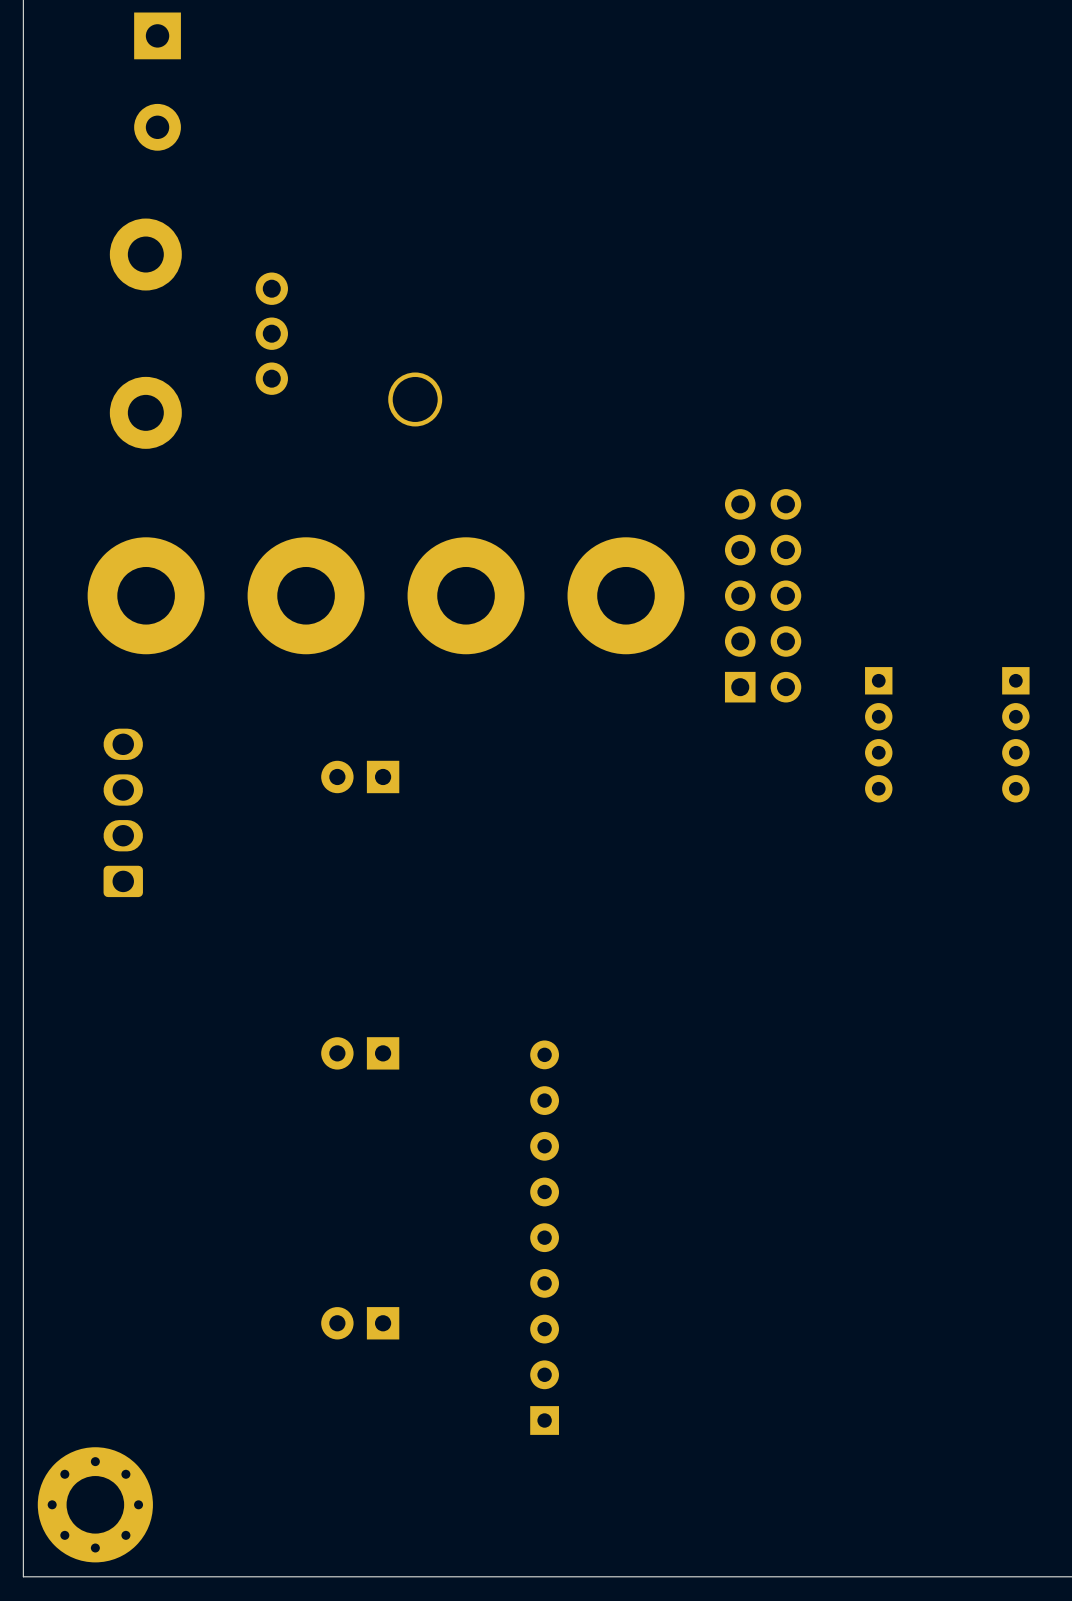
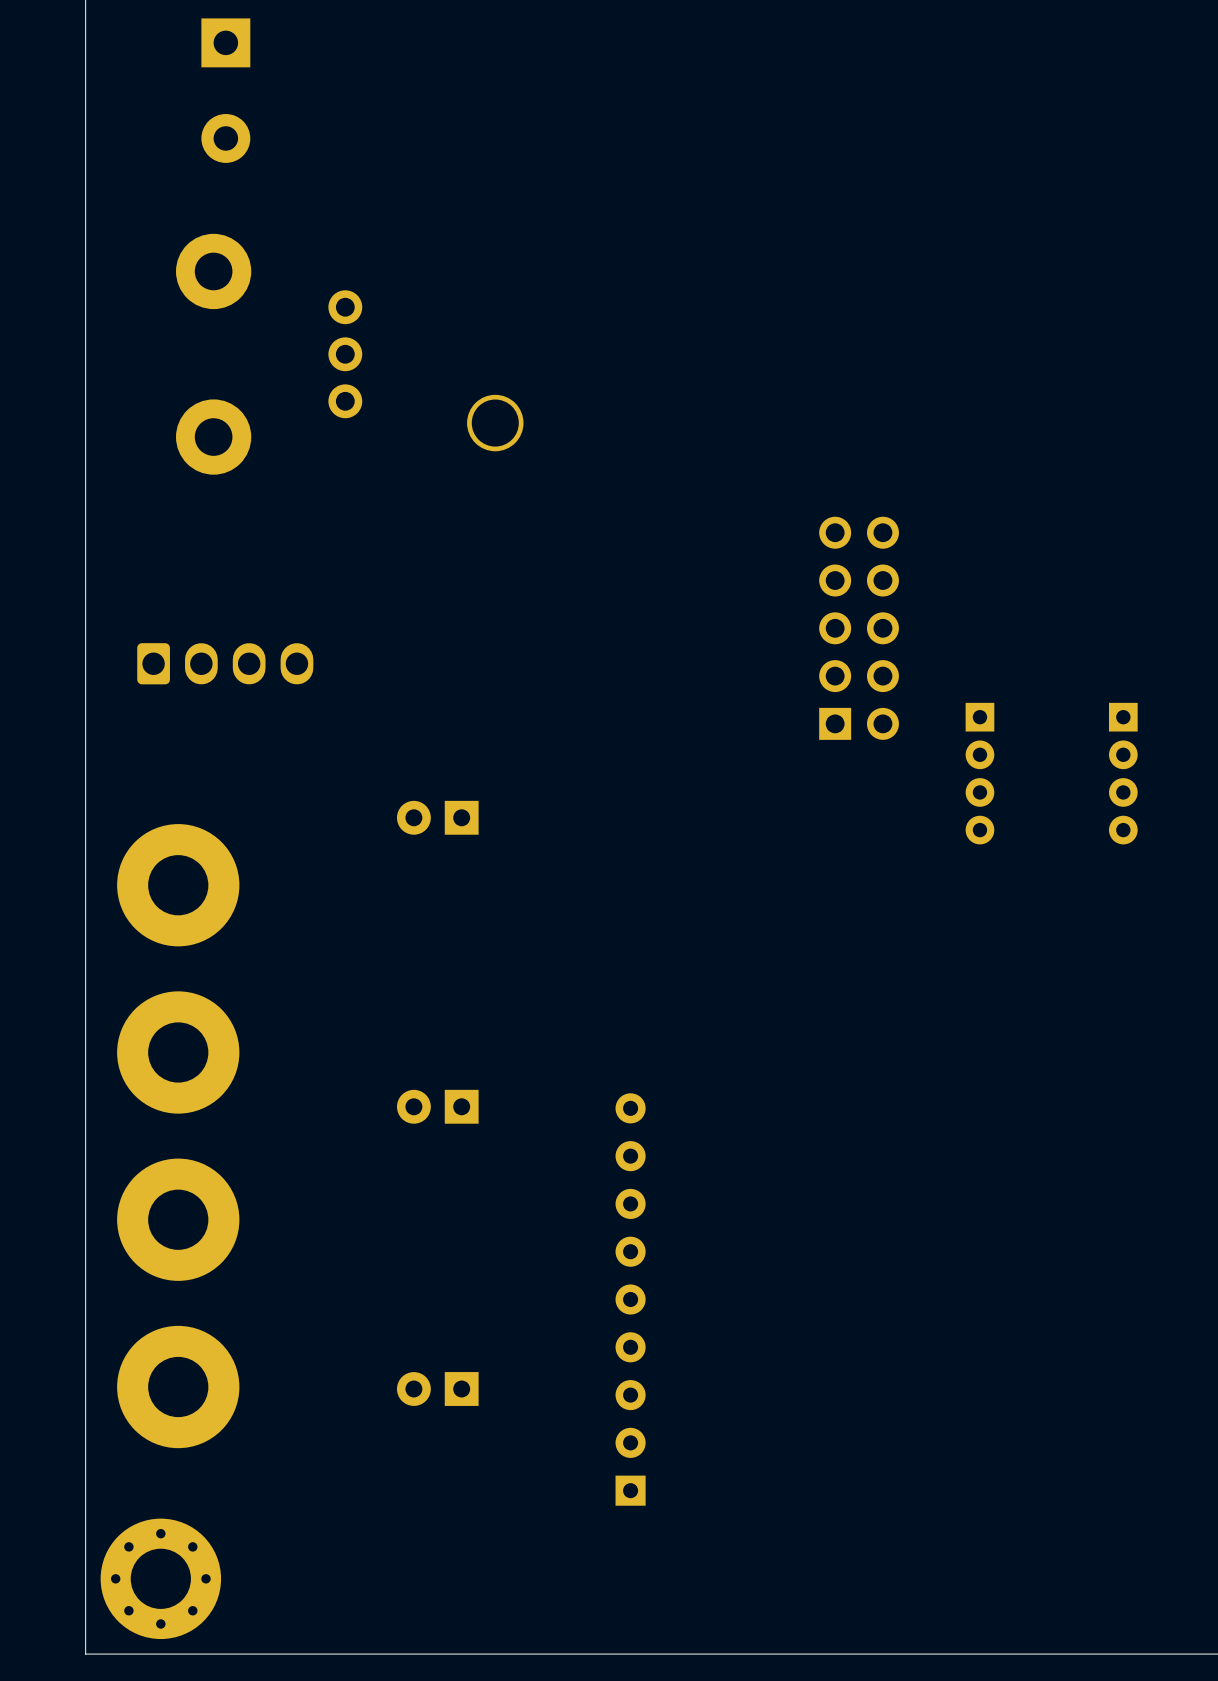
part: (146, 595) -> none
part: (306, 595) -> none
part: (466, 595) -> none
part: (626, 595) -> none
part rotation: 0° (123, 812) -> 90° clockwise (225, 663)
part position: (123, 812) -> (225, 663)
part: none -> (178, 885)
part: none -> (178, 1052)
part: none -> (178, 1219)
part: none -> (178, 1387)

